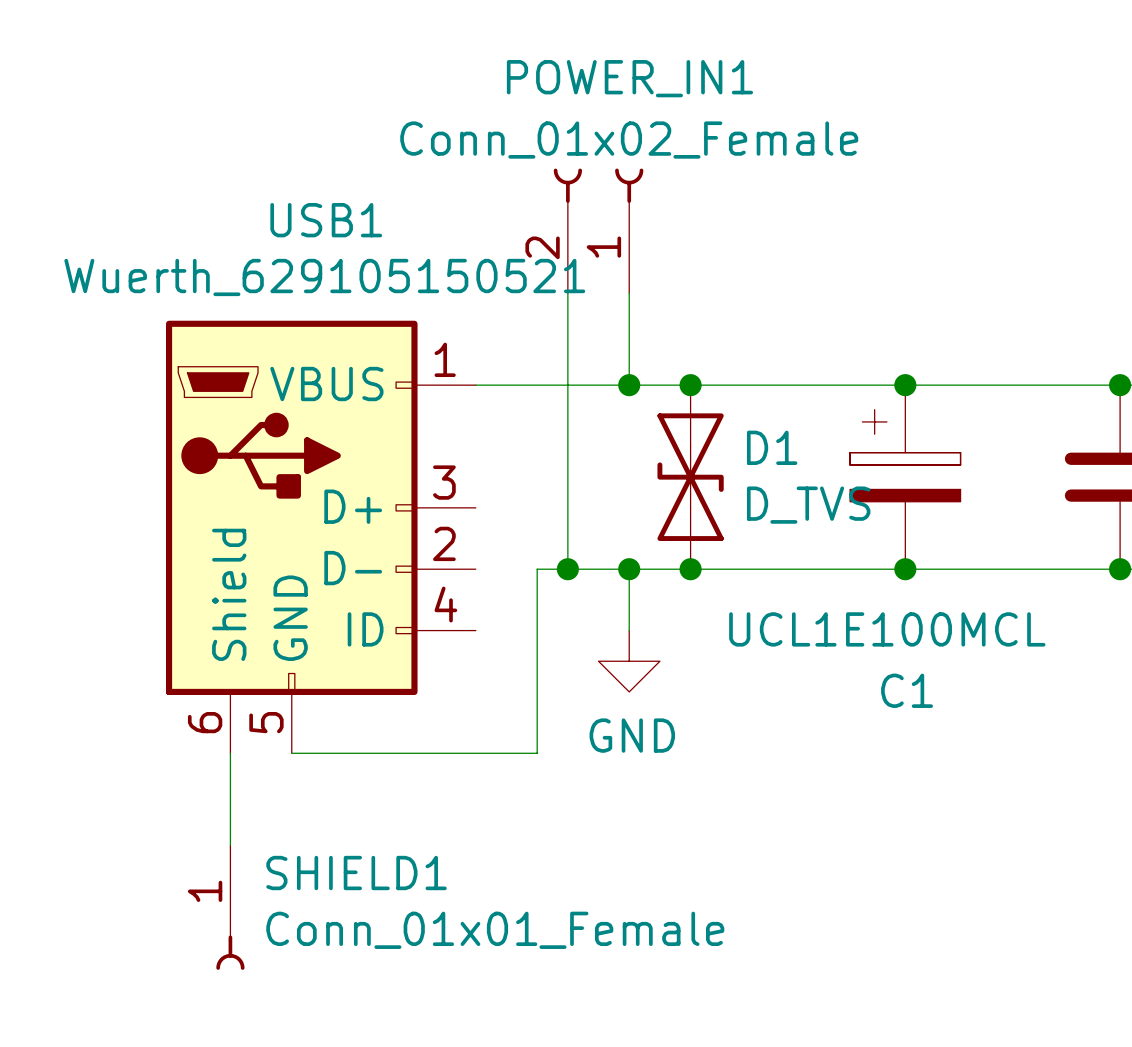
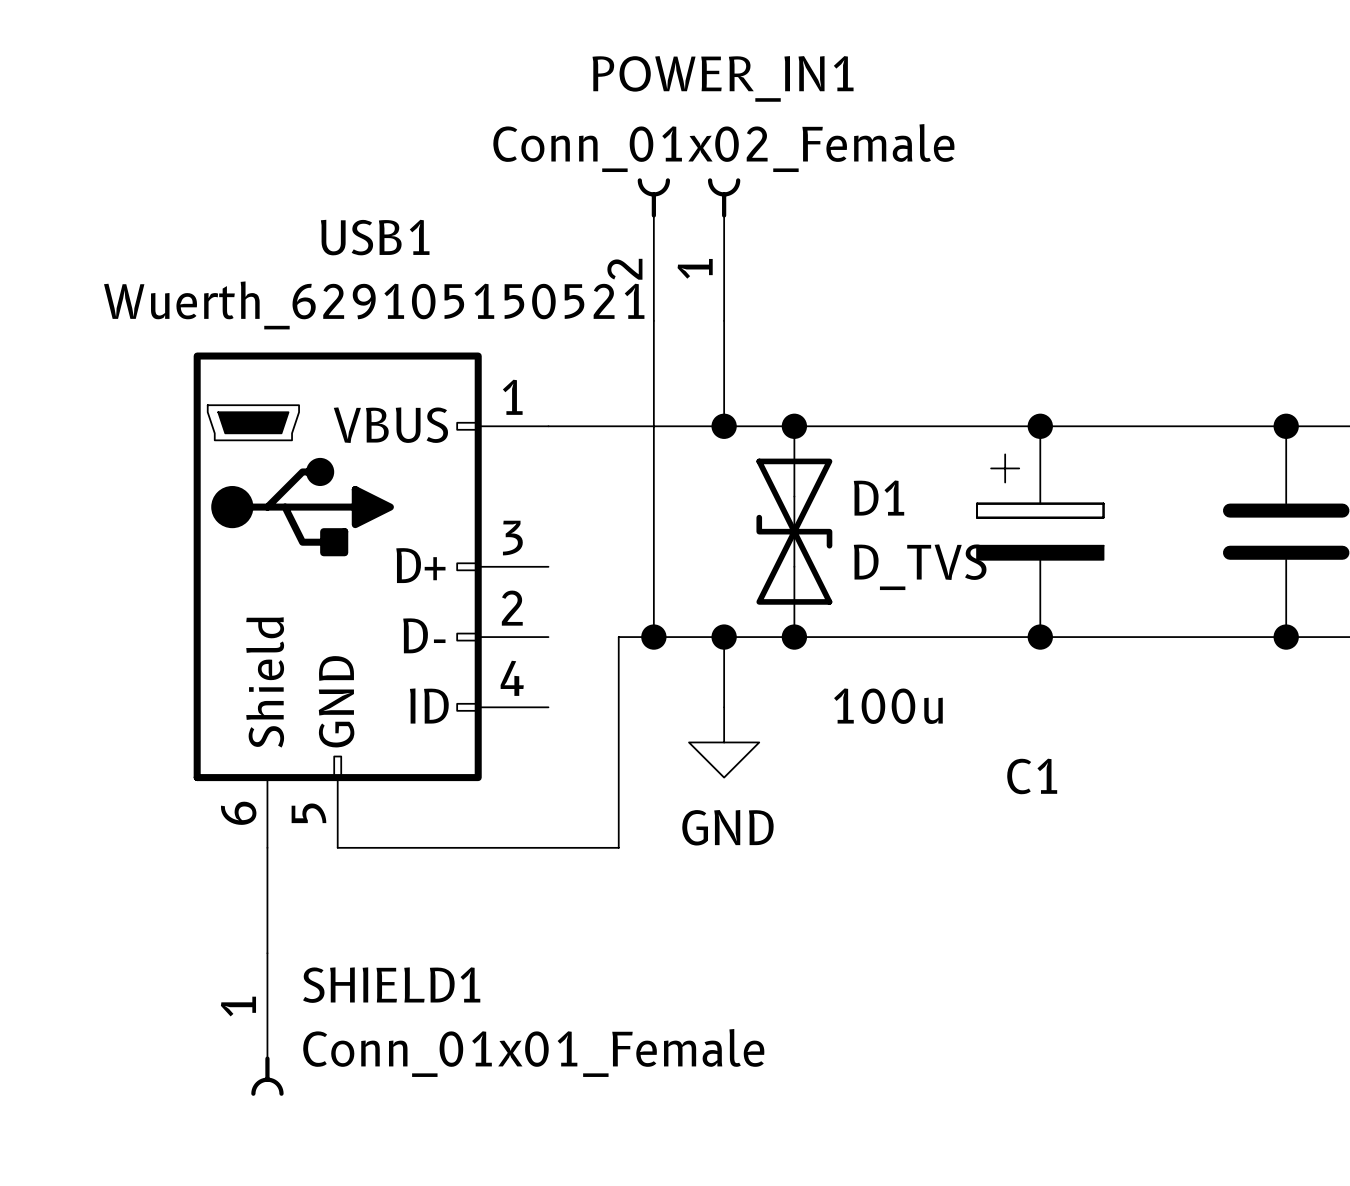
C1 value: UCL1E100MCL (887, 629) -> 100u (888, 706)

